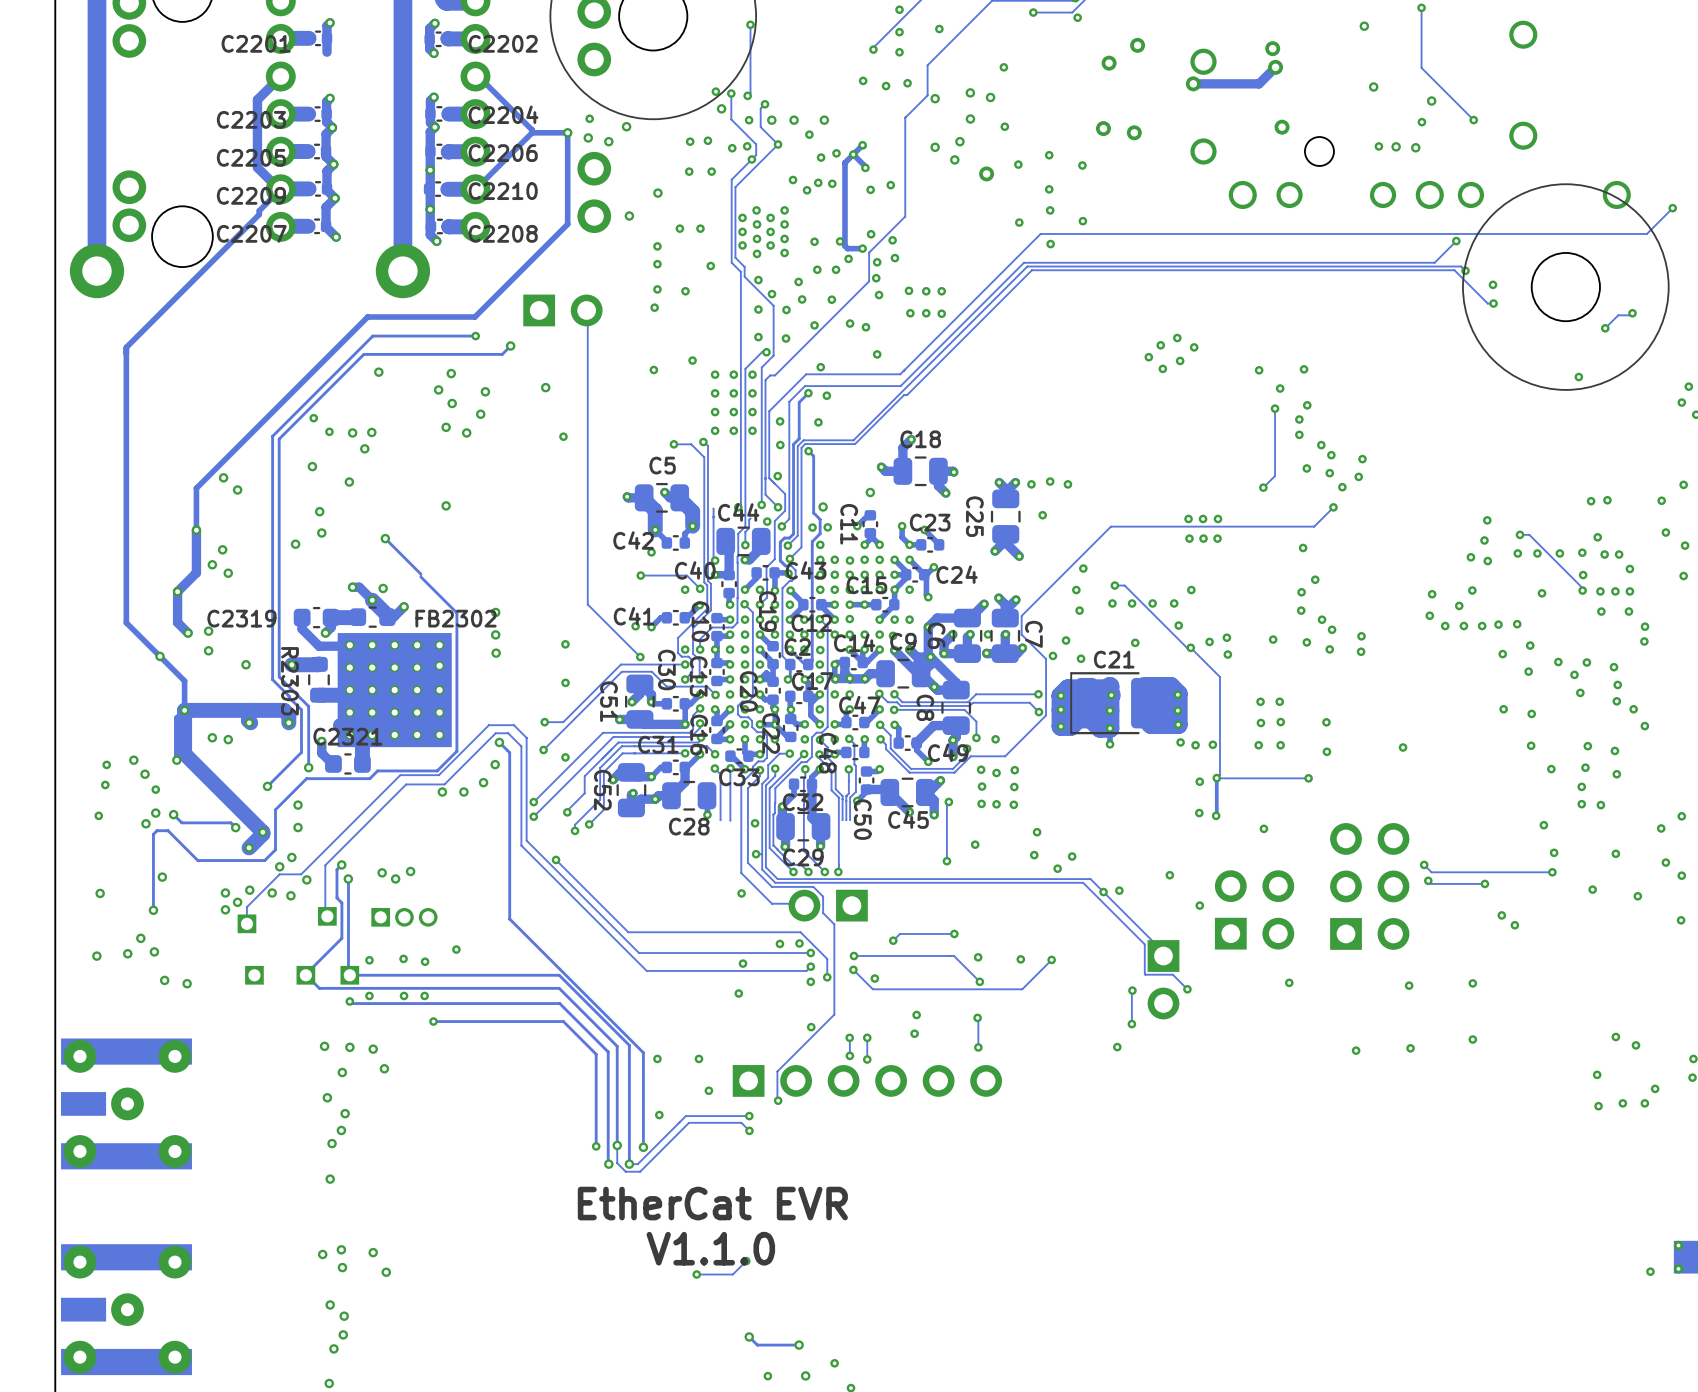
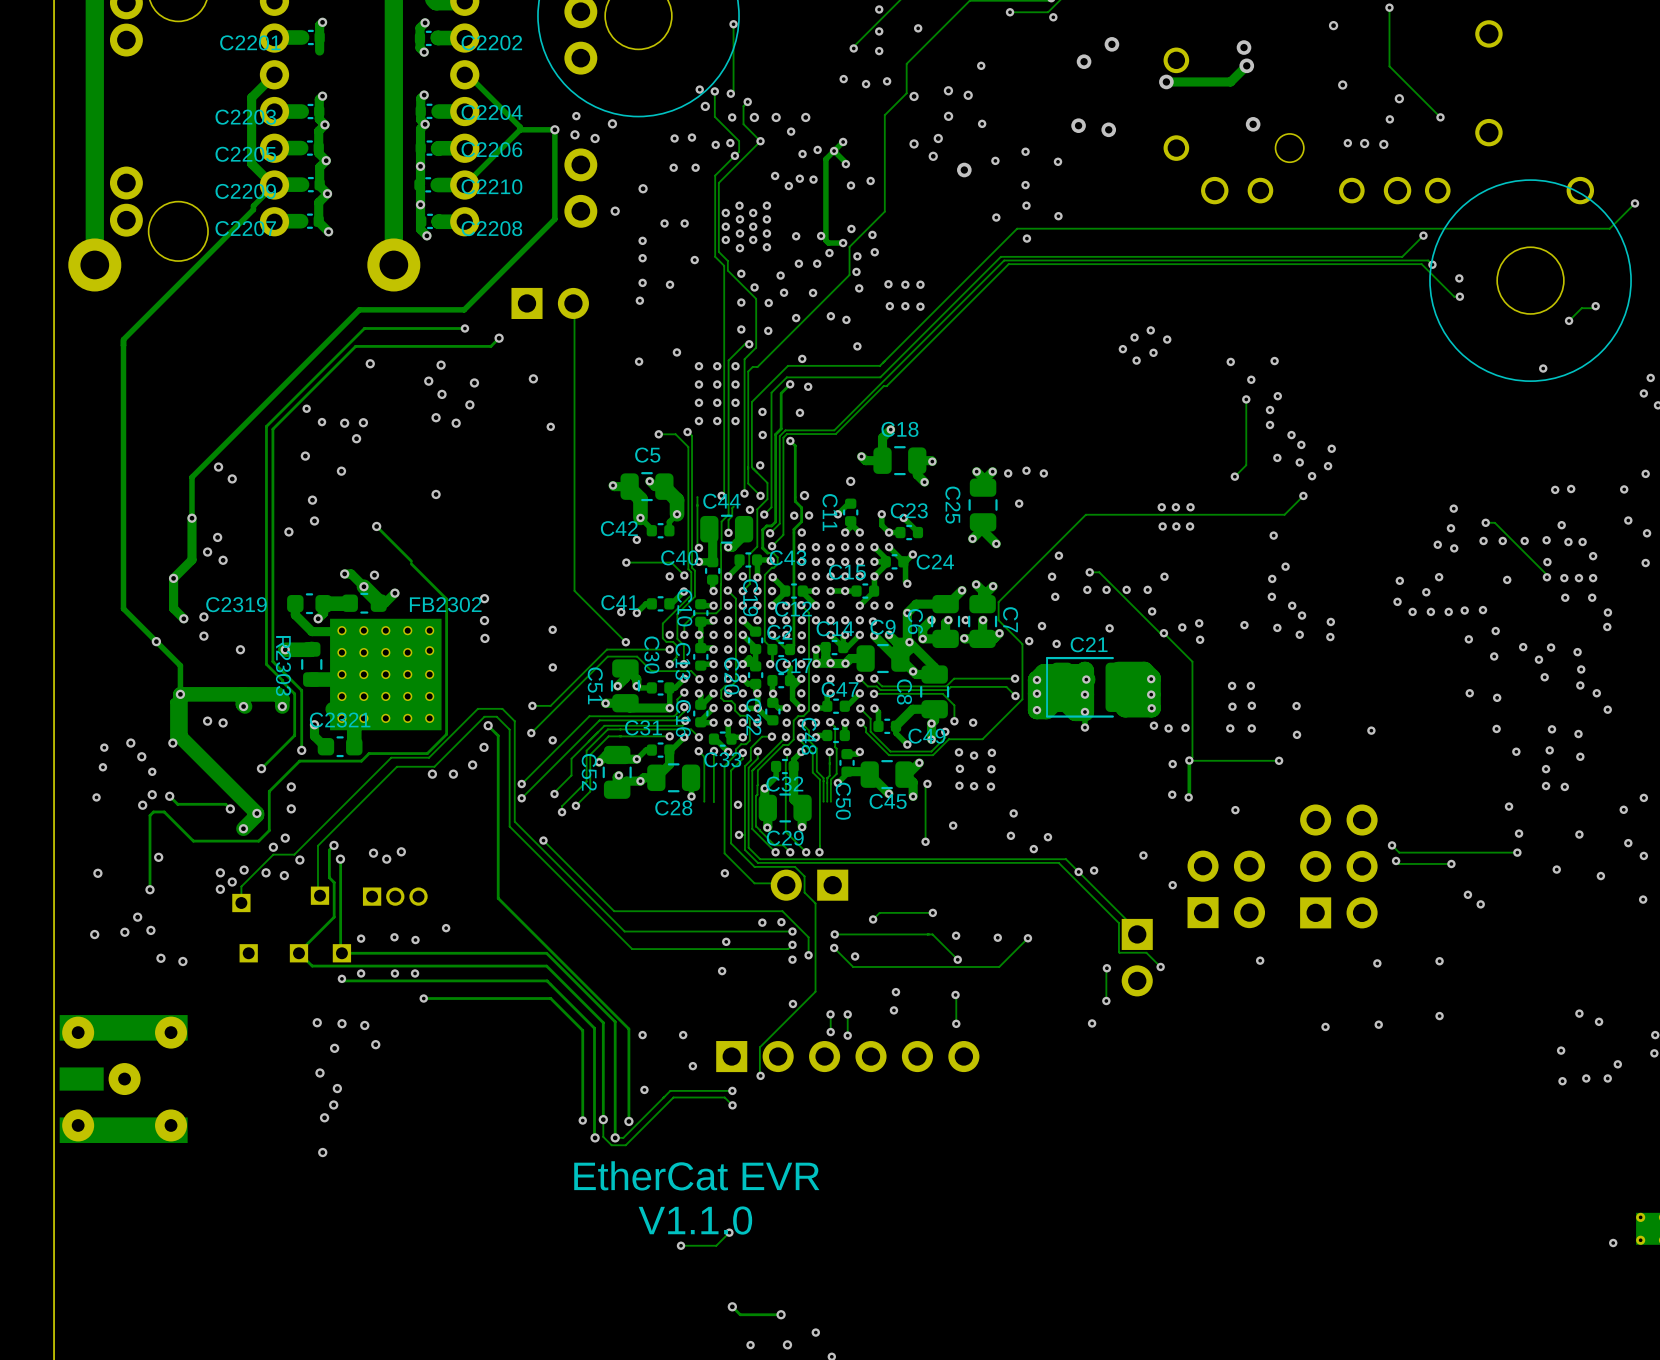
via: (341, 1249) -> none
via: (373, 1252) -> none
via: (322, 1254) -> none
via: (342, 1267) -> none
via: (386, 1272) -> none
via: (330, 1304) -> none
part: (126, 1309) -> none
via: (344, 1316) -> none
via: (343, 1334) -> none
via: (333, 1348) -> none
via: (329, 1383) -> none

